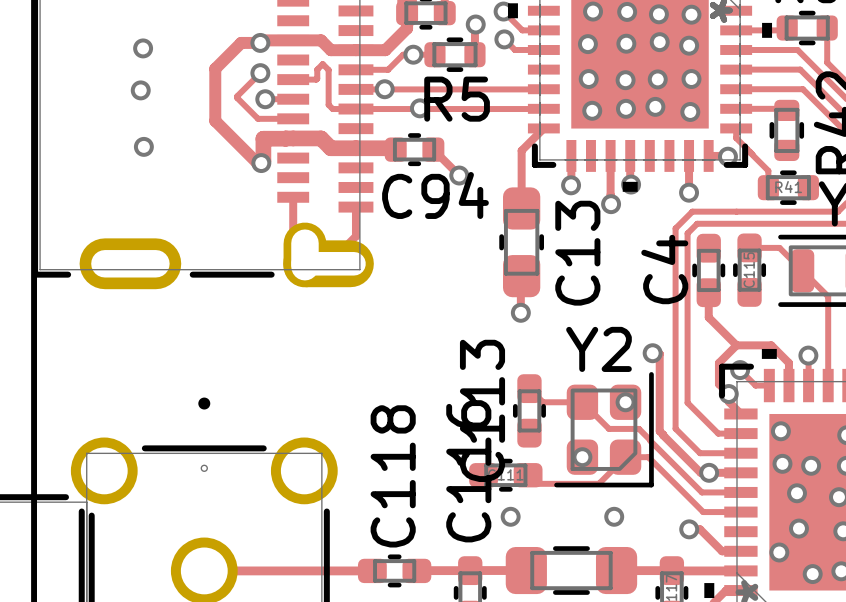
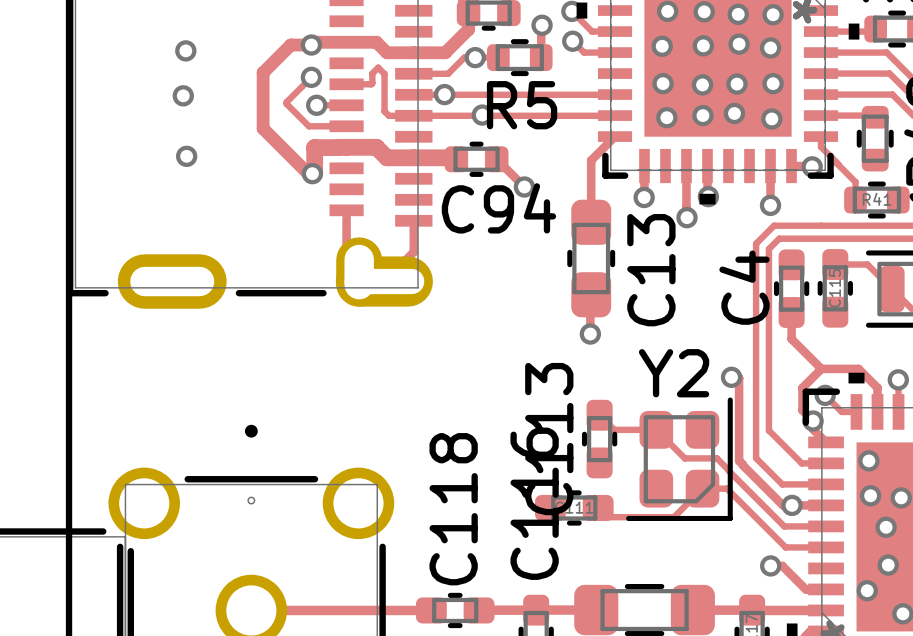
via: (625, 402) -> none
via: (582, 457) -> none
via: (510, 516) -> none
via: (614, 516) -> none

